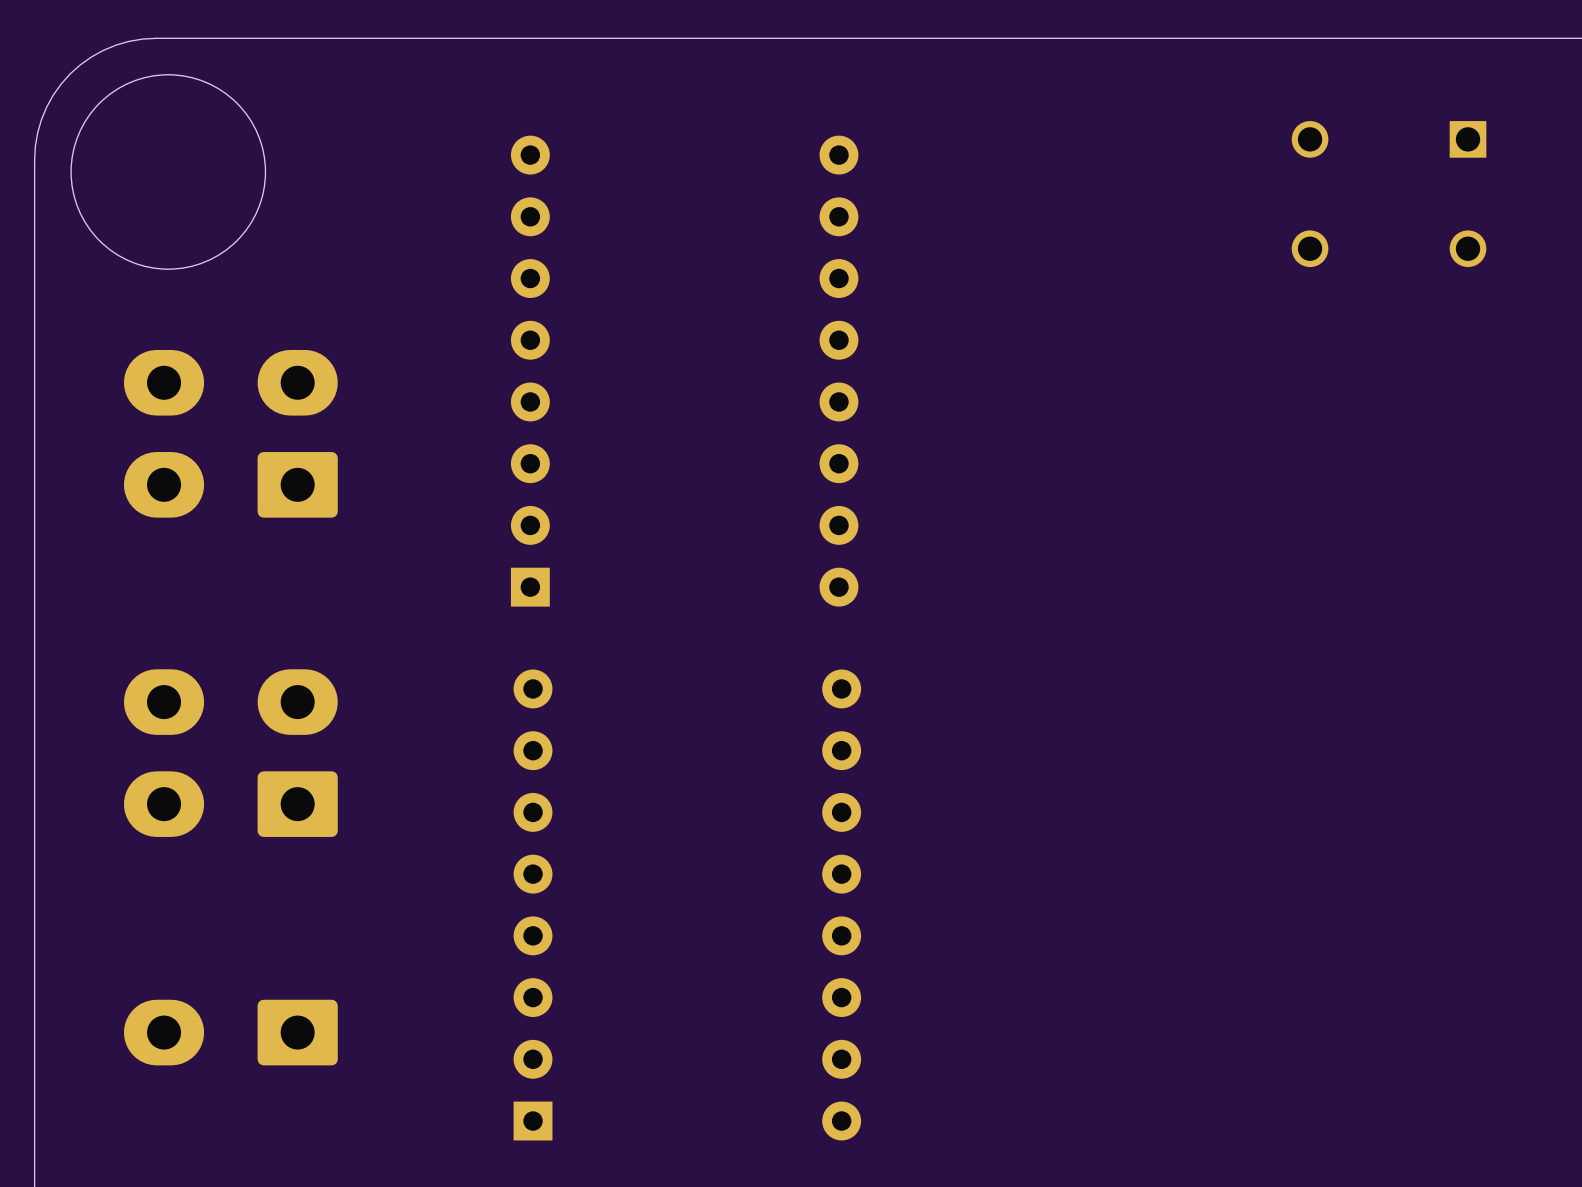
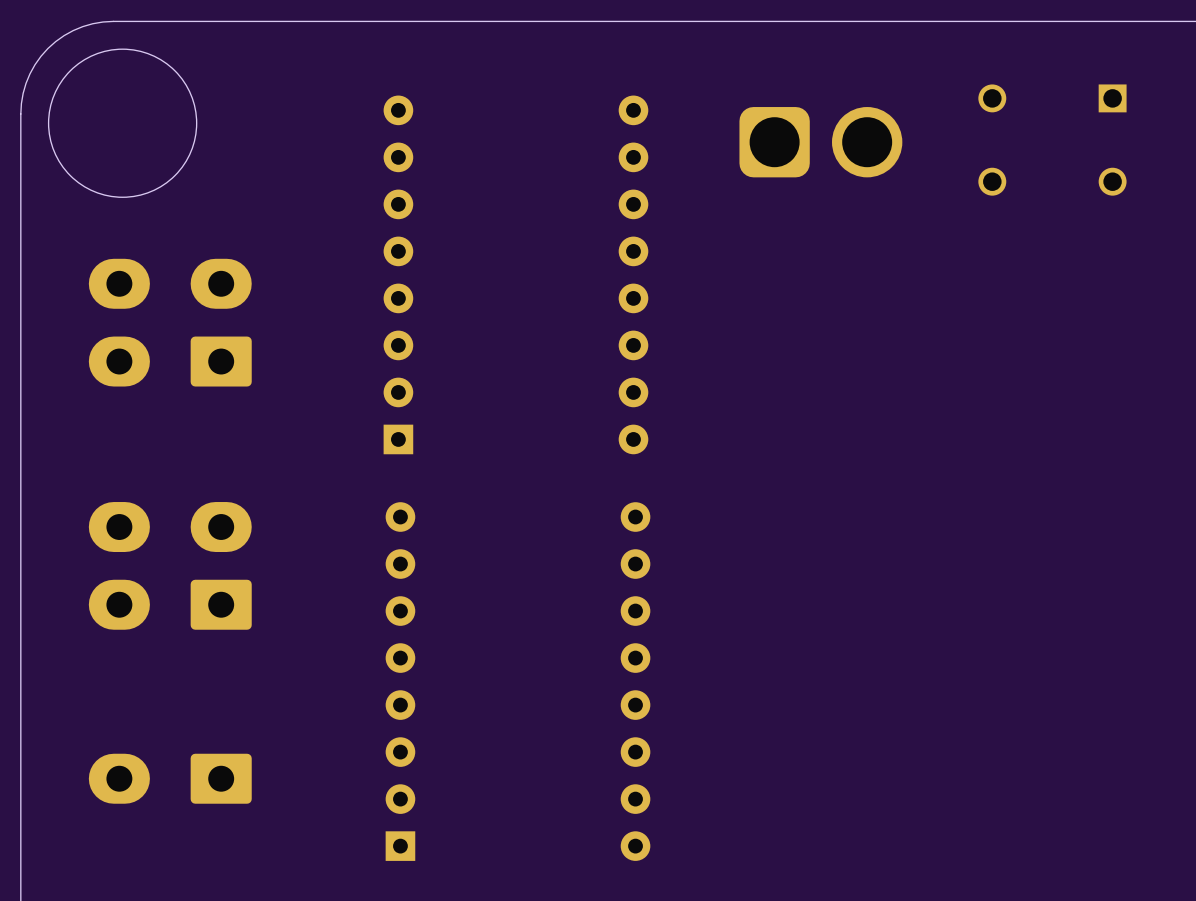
part: none -> (820, 142)

